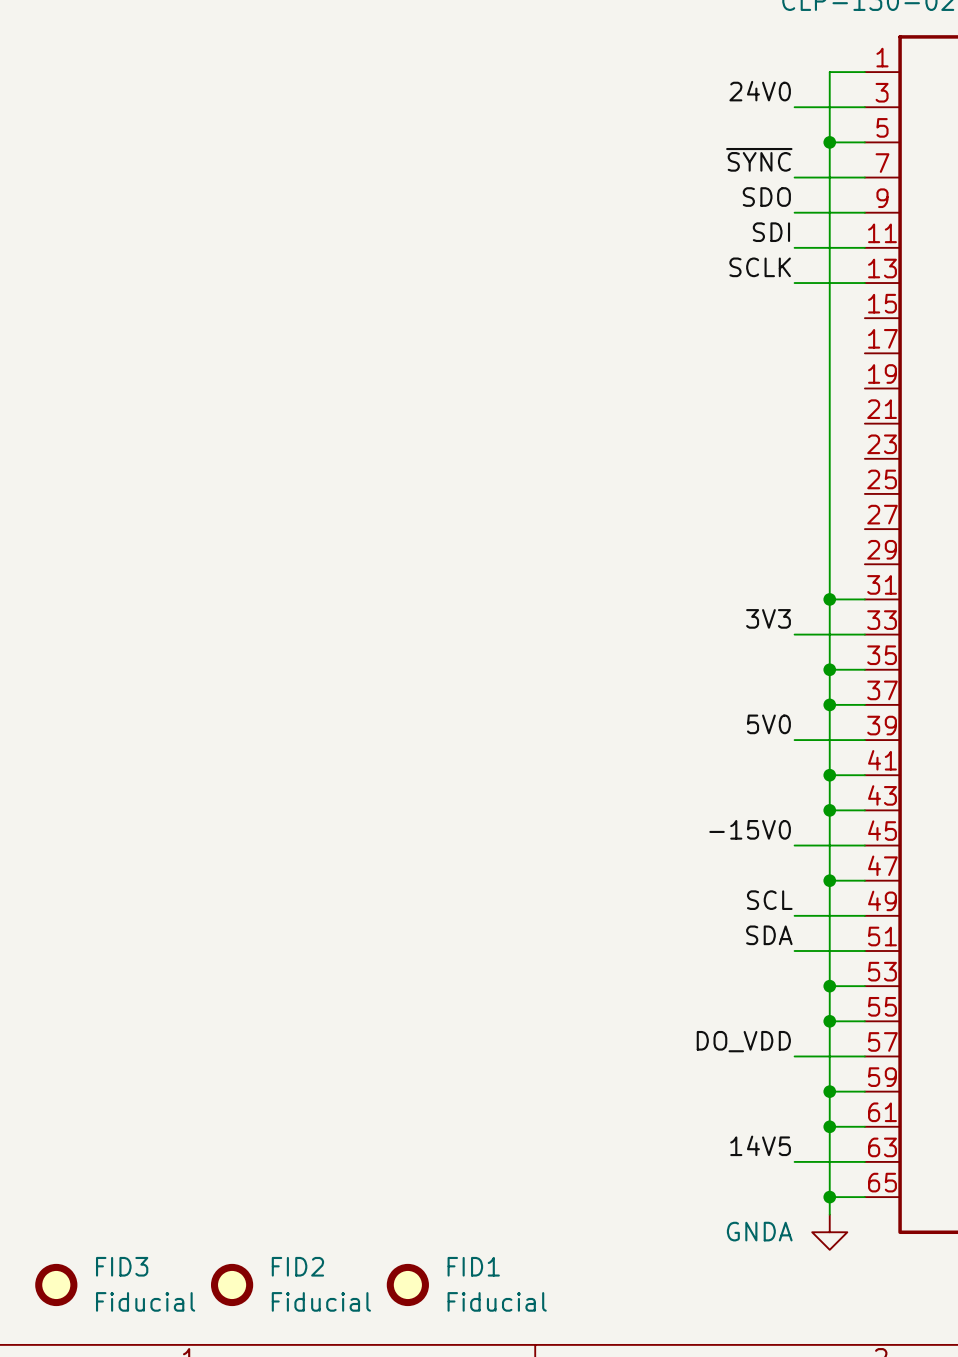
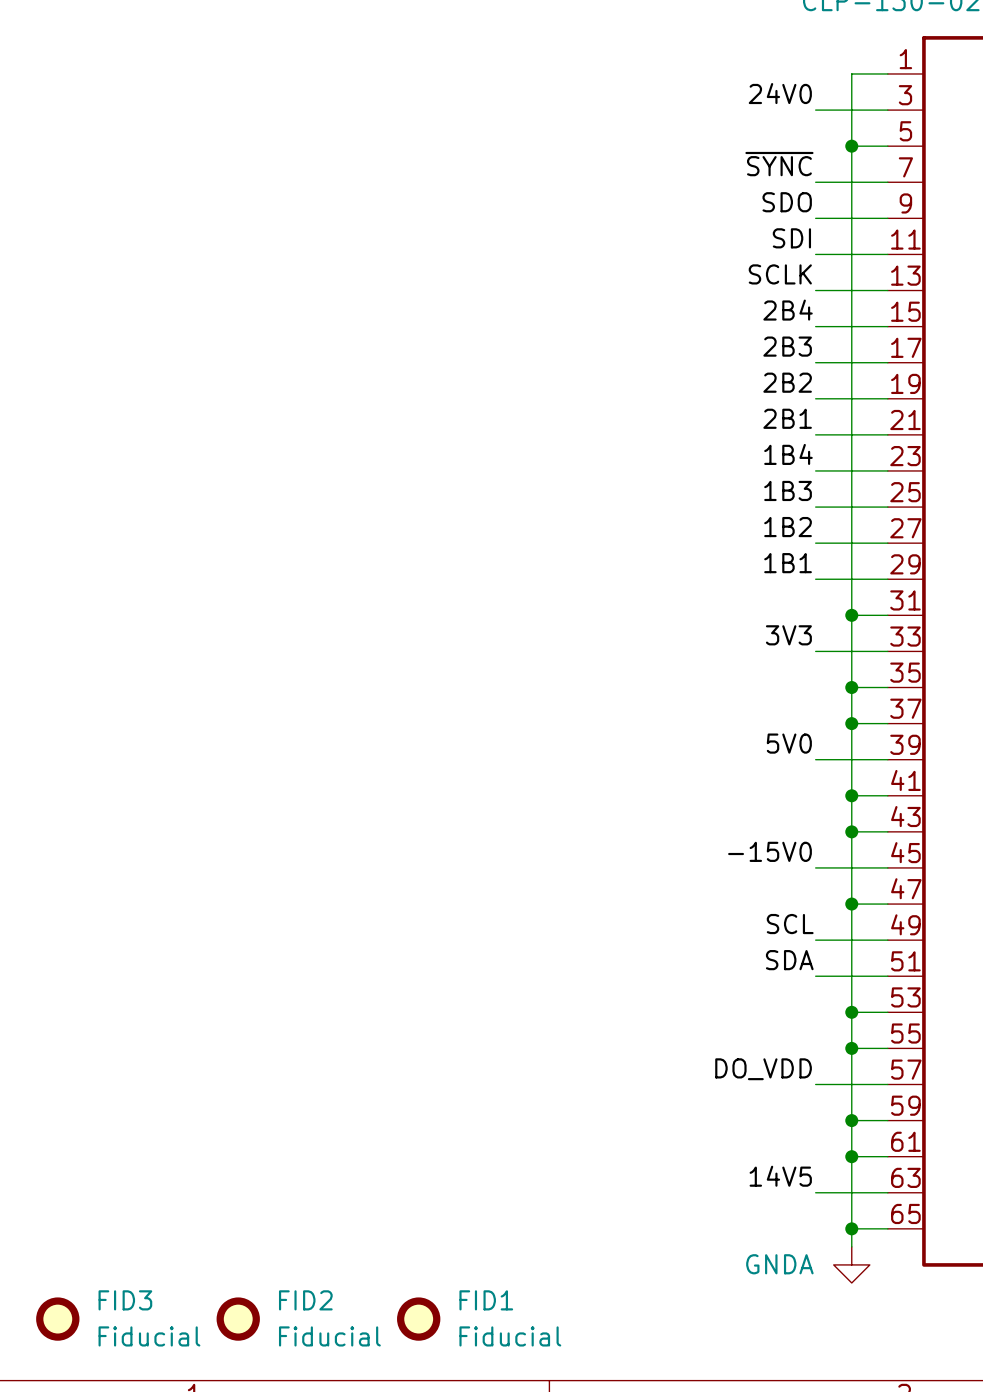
label: none -> 2B4 (788, 310)
wire: none -> (815, 326) (887, 326)
label: none -> 2B3 (787, 346)
wire: none -> (815, 362) (887, 362)
label: none -> 2B2 (787, 382)
wire: none -> (815, 398) (887, 398)
label: none -> 2B1 (787, 418)
wire: none -> (815, 434) (887, 434)
label: none -> 1B4 (788, 454)
wire: none -> (815, 470) (887, 470)
label: none -> 1B3 (788, 490)
wire: none -> (815, 507) (887, 507)
label: none -> 1B2 (788, 527)
wire: none -> (815, 543) (887, 543)
label: none -> 1B1 (788, 563)
wire: none -> (815, 579) (887, 579)

